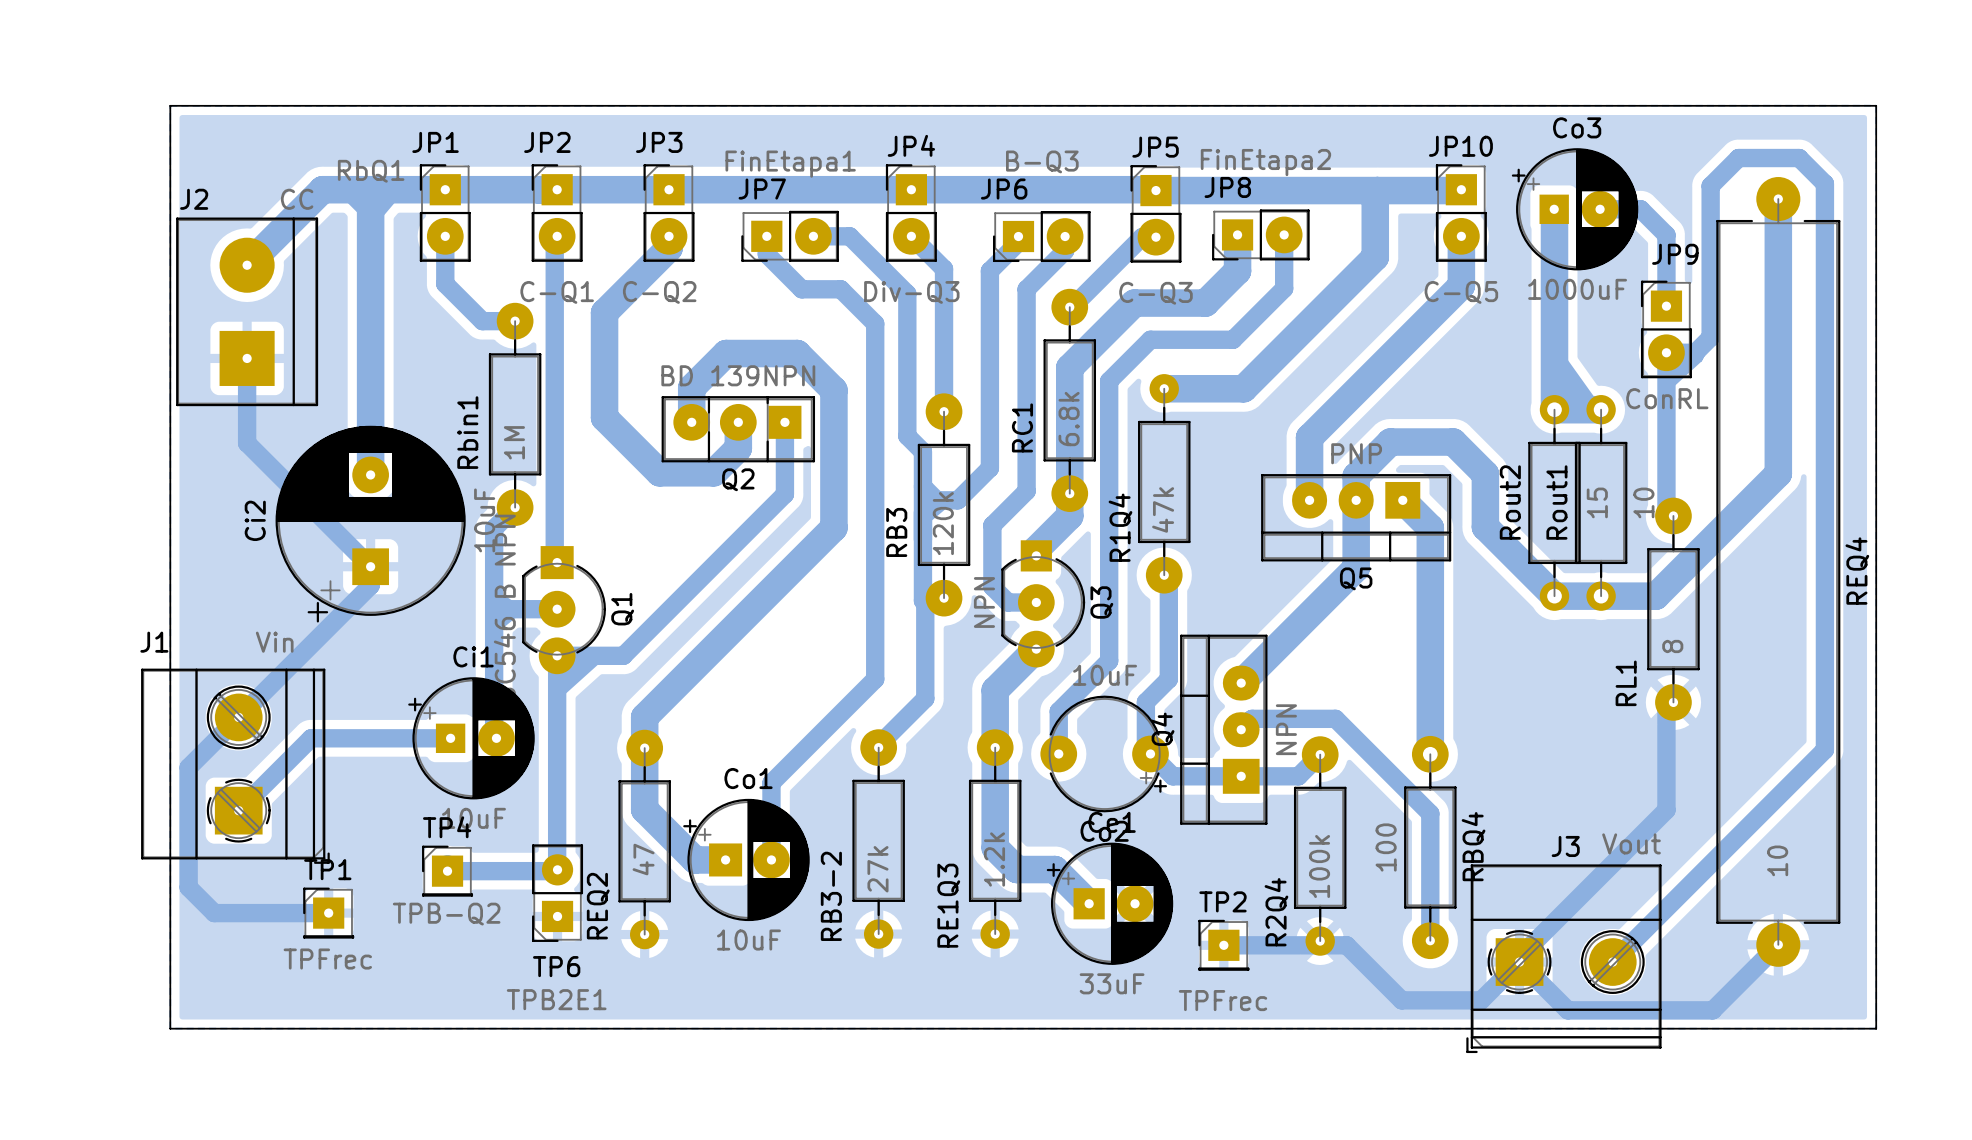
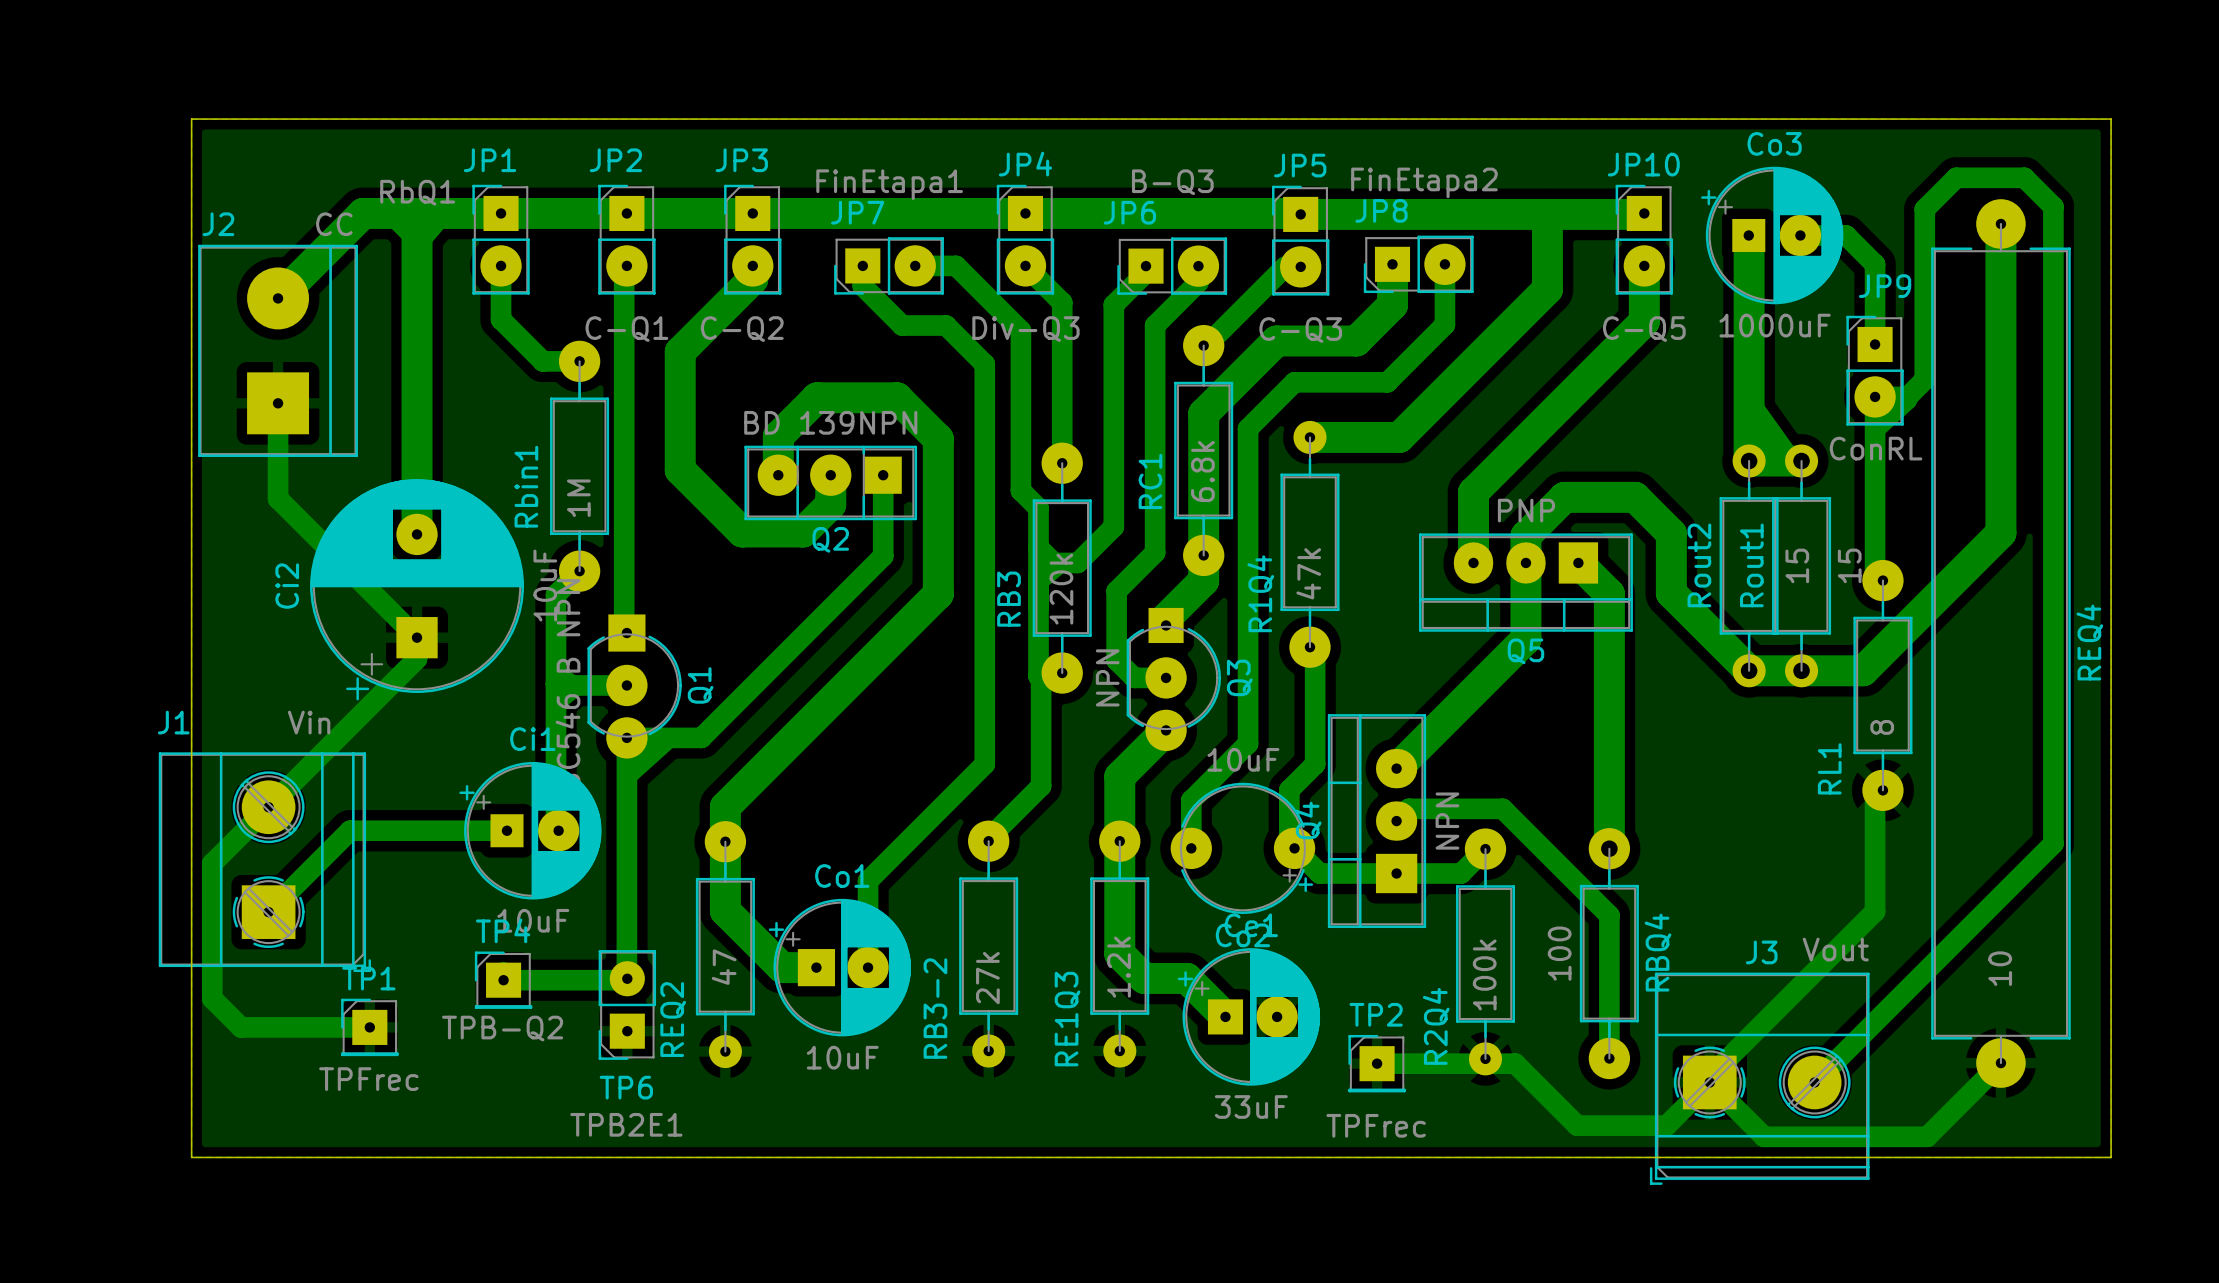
Rout1 value: 10 (1643, 502) -> 15 (1849, 565)

